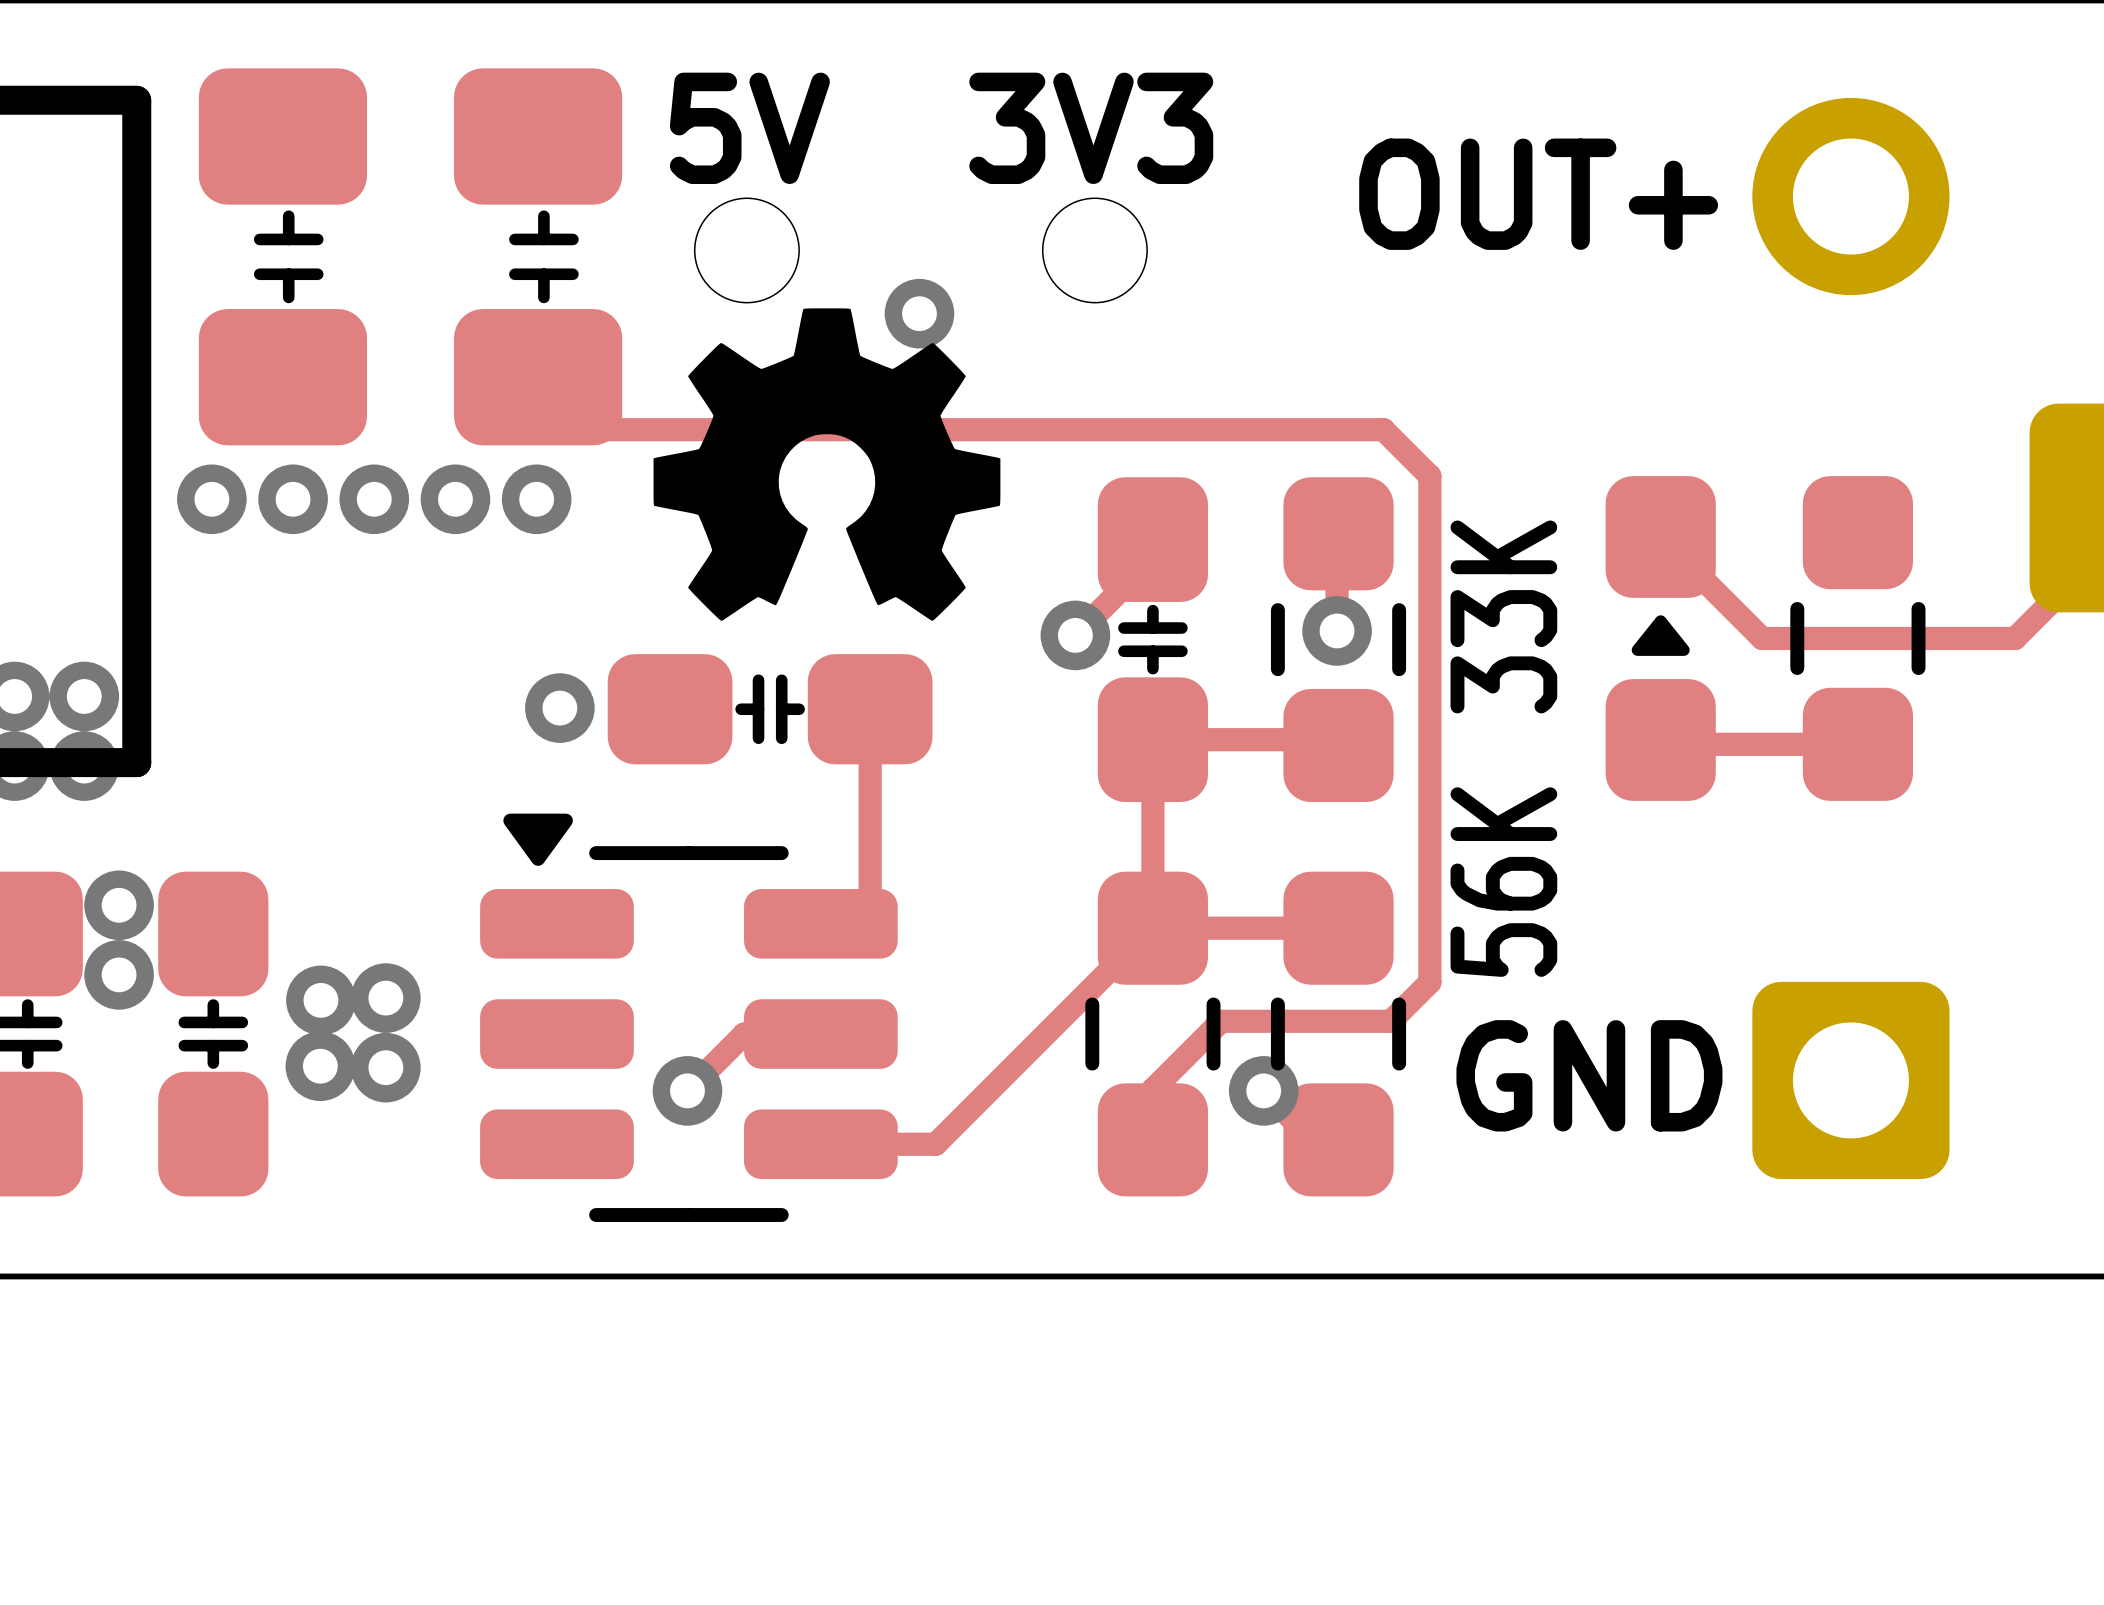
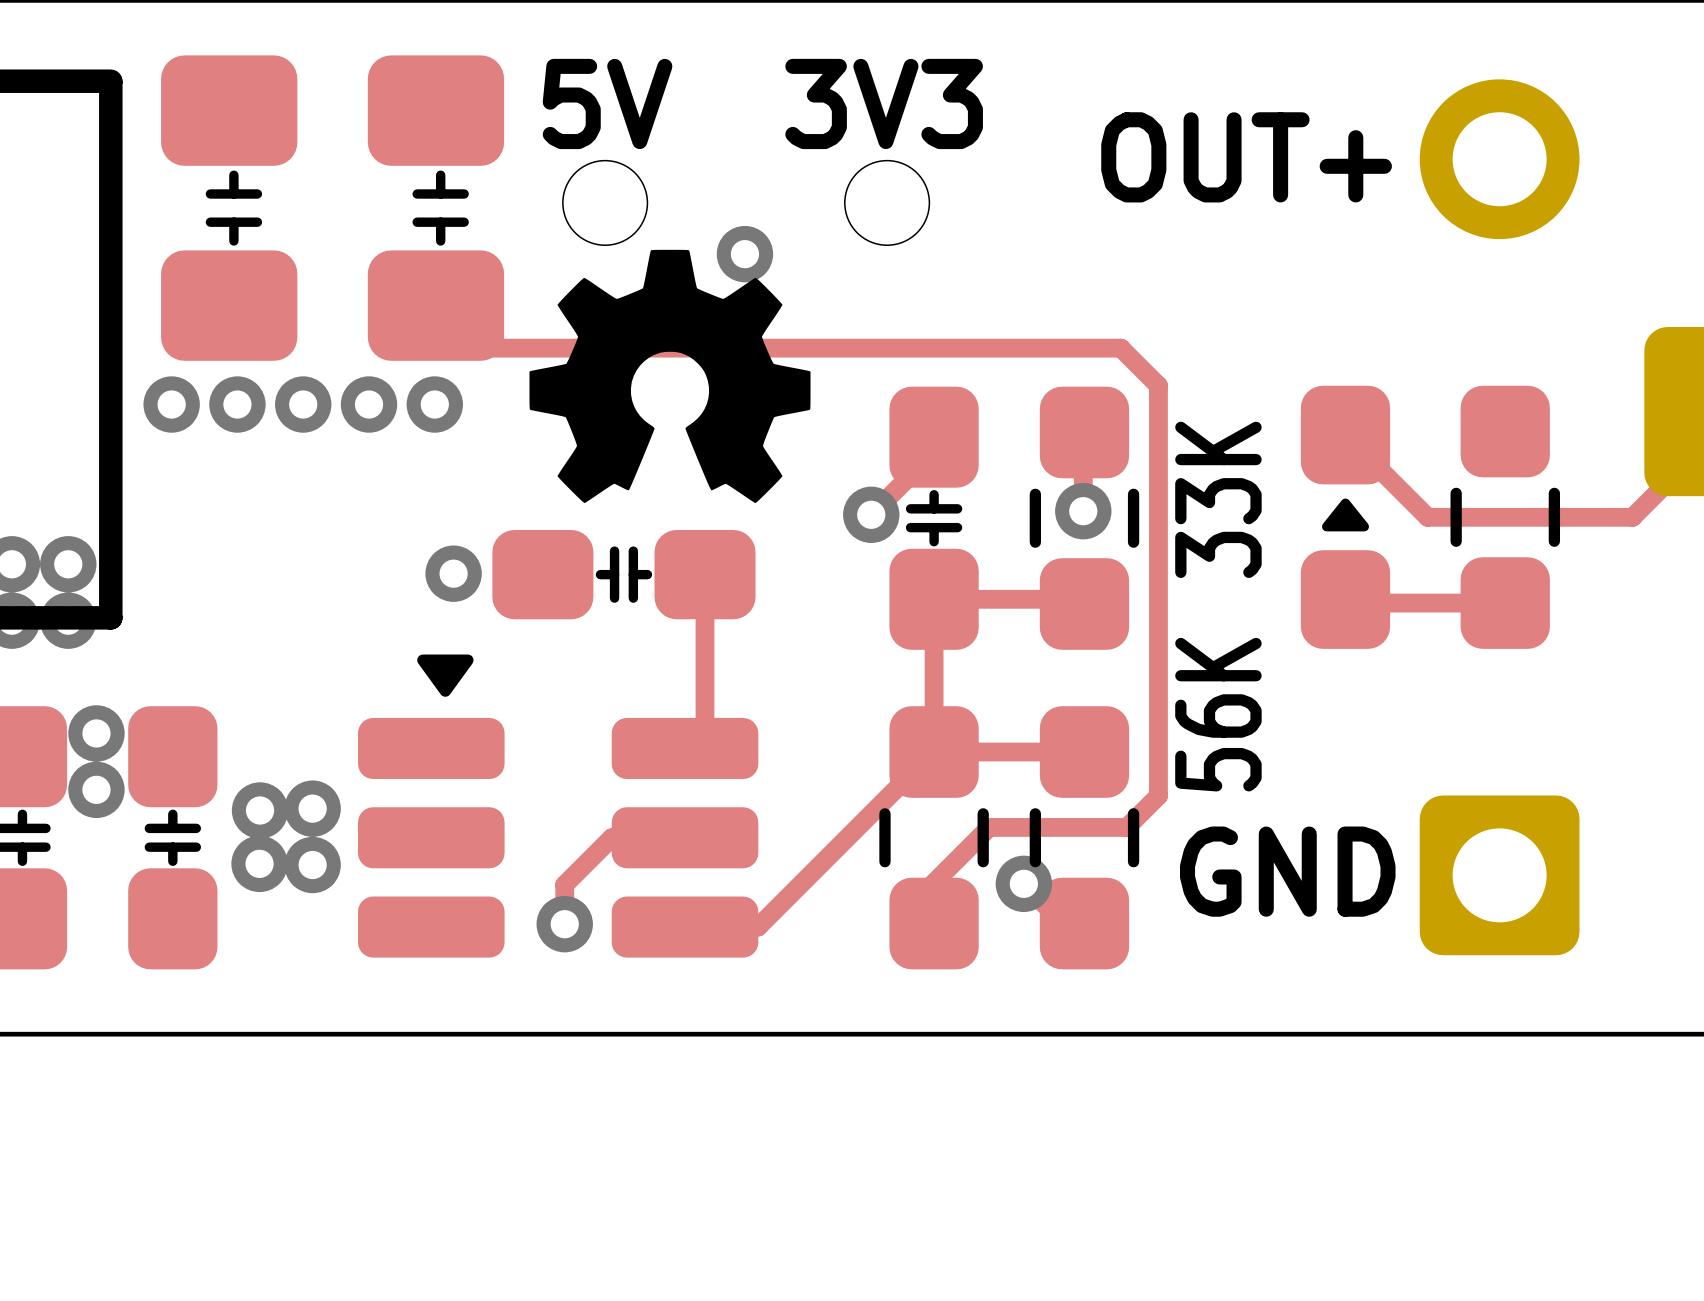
part footprint: [480, 813, 898, 1222] -> [357, 654, 759, 958]
track: (755, 1034) (744, 1034) (687, 1090) -> (611, 837) (564, 884) (564, 924)
via position: (687, 1090) -> (564, 924)

